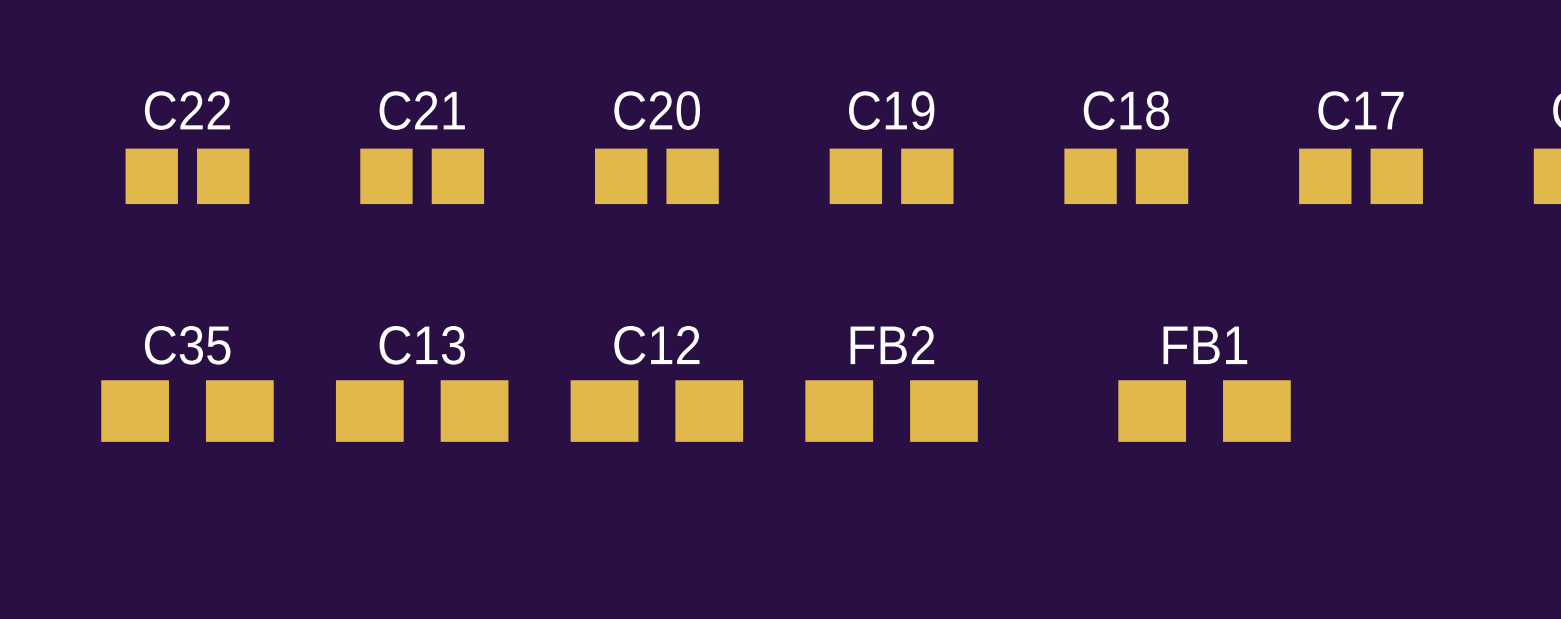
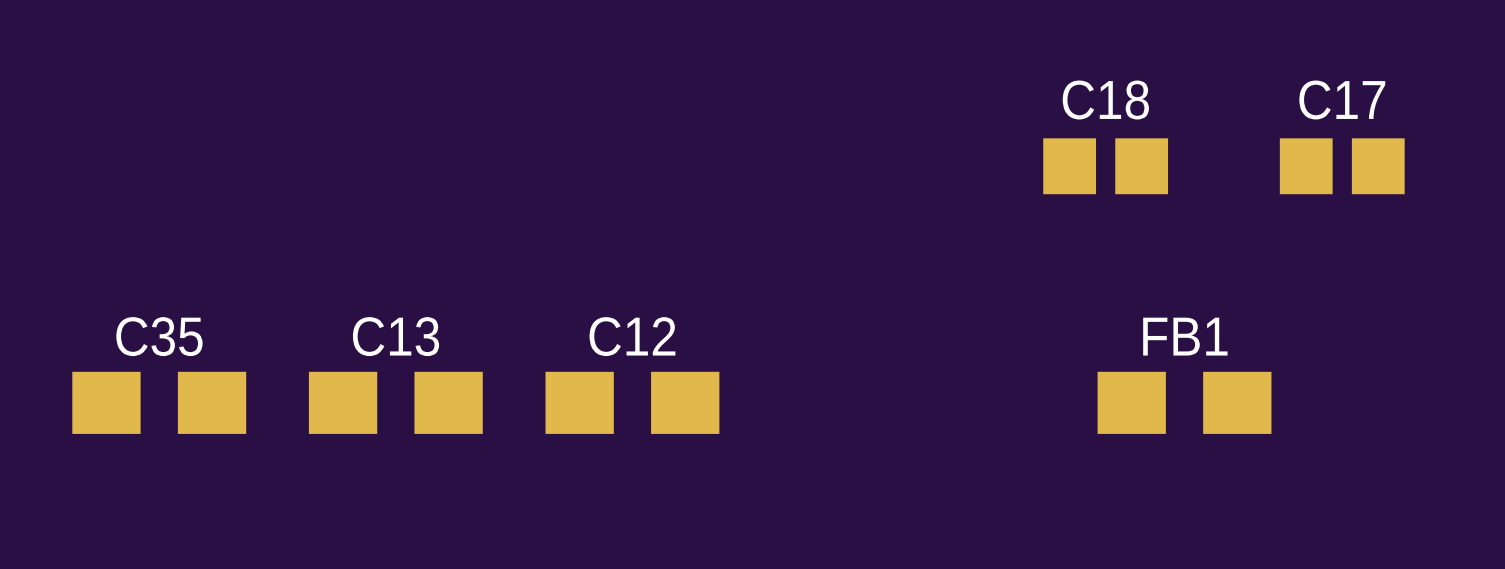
C22: (187, 176) -> none
C21: (422, 176) -> none
C20: (656, 176) -> none
C19: (891, 176) -> none
FB2: (891, 411) -> none

